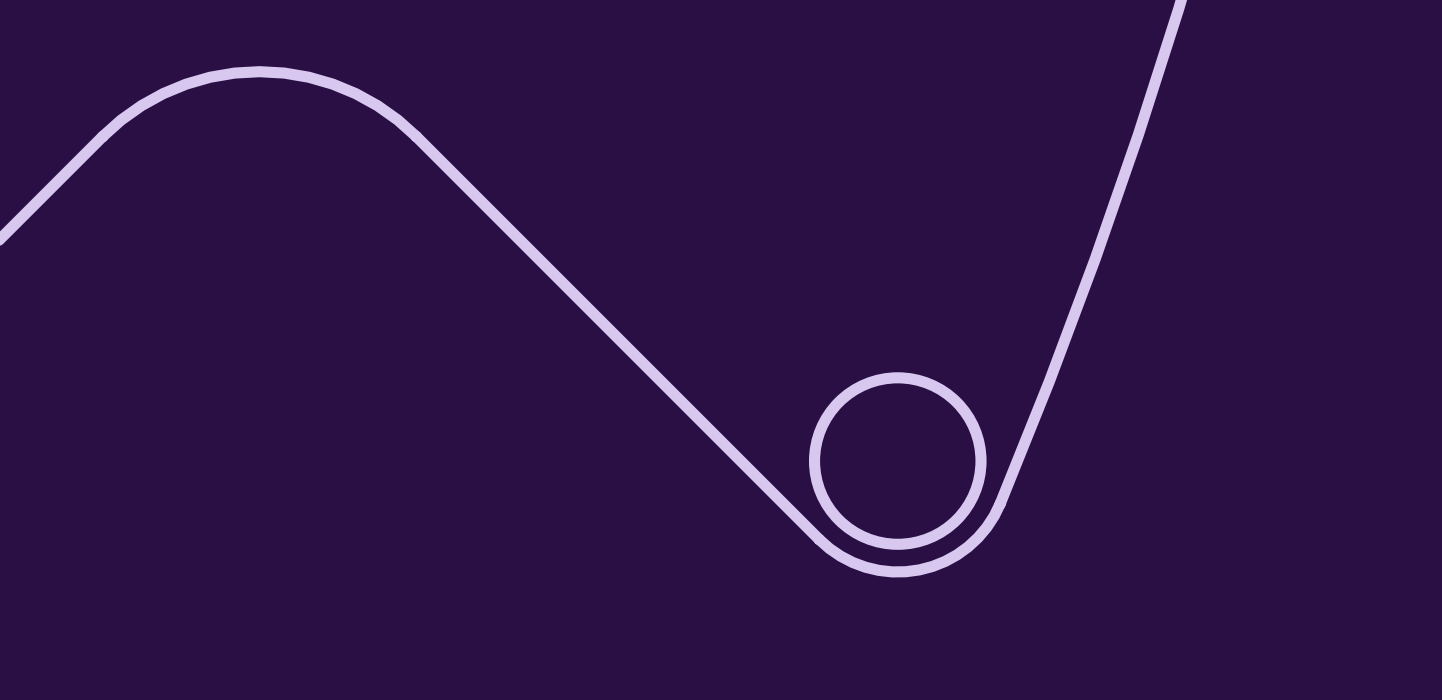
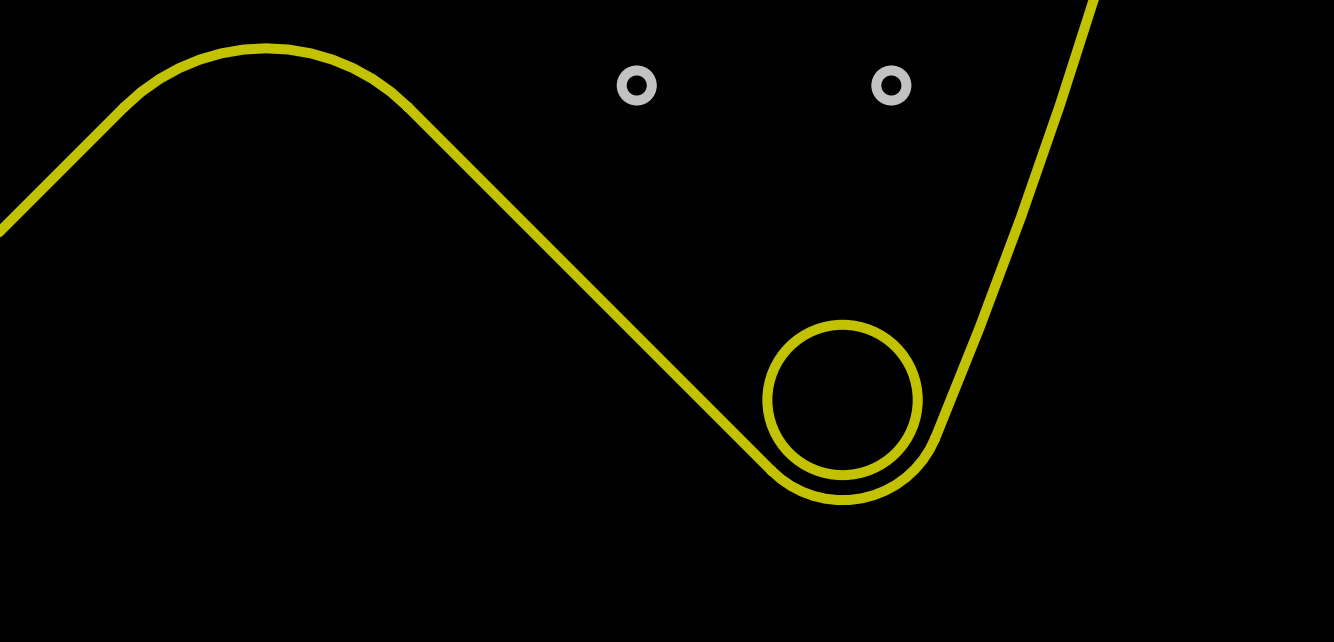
via: none -> (636, 85)
via: none -> (891, 85)

